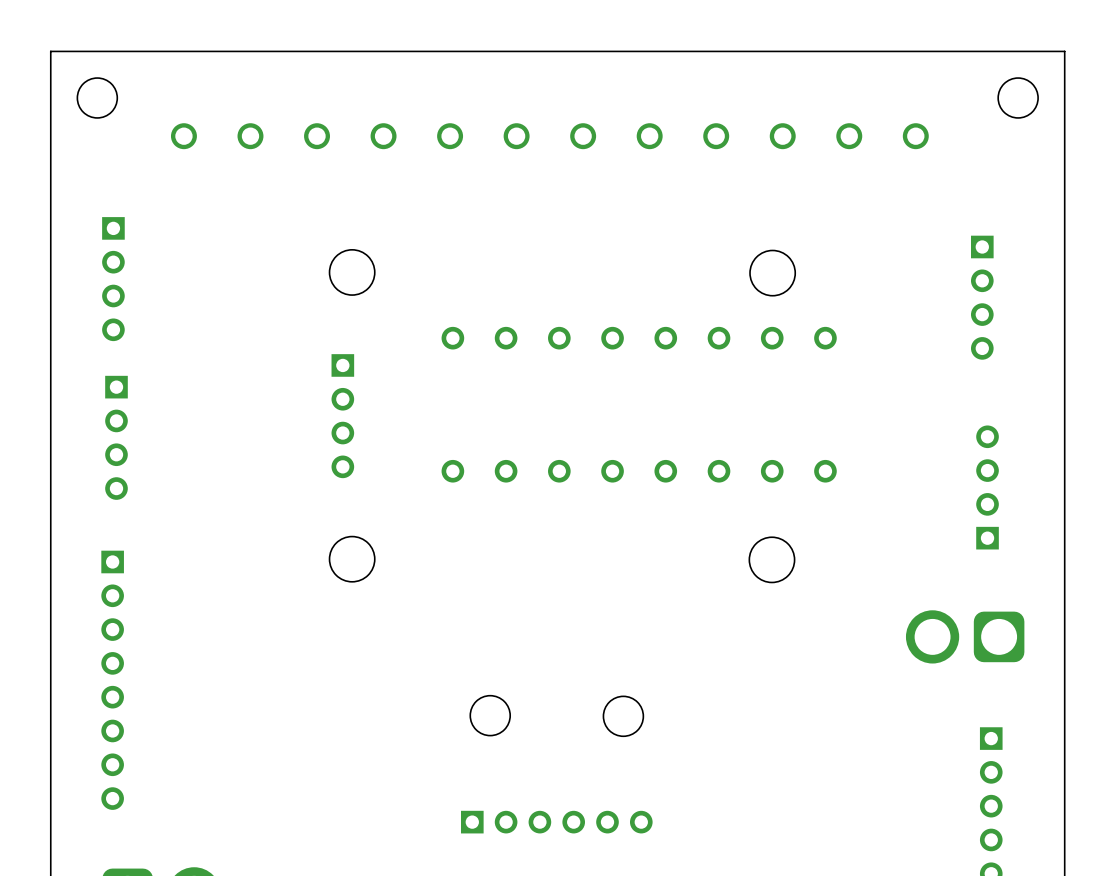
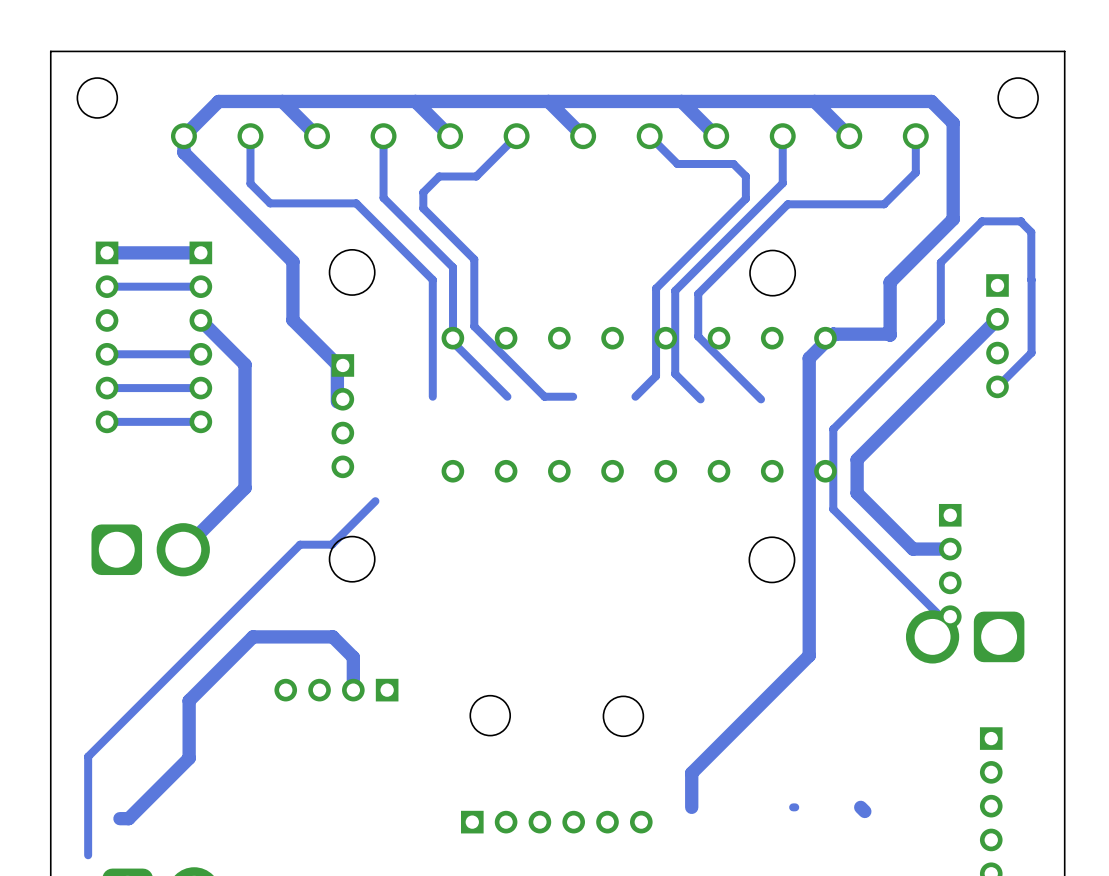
track: none -> (282, 101) (317, 136)
track: none -> (415, 101) (450, 136)
track: none -> (548, 101) (583, 136)
track: none -> (681, 101) (716, 136)
track: none -> (814, 101) (849, 136)
track: none -> (250, 136) (250, 183) (270, 203) (356, 203) (432, 279) (432, 396)
track: none -> (383, 136) (383, 197) (453, 267) (453, 342) (507, 396)
track: none -> (516, 136) (476, 176) (439, 176) (423, 192) (423, 208) (474, 259) (474, 326) (544, 396) (573, 396)
track: none -> (649, 136) (677, 163) (733, 163) (745, 176) (745, 198) (656, 288) (656, 376) (635, 396)
track: none -> (782, 136) (782, 183) (675, 290) (675, 373) (700, 399)
track: none -> (915, 136) (915, 172) (884, 204) (787, 204) (698, 293) (698, 336) (761, 399)
track: none -> (200, 252) (107, 252)
part: (113, 279) -> none
track: none -> (200, 286) (107, 286)
part position: (982, 297) -> (997, 336)
track: none -> (997, 319) (857, 459) (857, 493) (913, 549) (950, 549)
track: none -> (200, 320) (245, 364) (245, 488) (183, 549)
track: none -> (833, 334) (890, 335) (890, 282) (953, 219) (953, 123) (931, 101) (218, 101) (183, 136) (183, 152) (292, 261) (292, 320) (337, 364) (337, 401)
track: none -> (833, 334) (809, 358) (809, 655) (691, 773) (691, 807)
part: none -> (107, 337)
part: none -> (200, 337)
track: none -> (200, 354) (107, 354)
track: none -> (997, 386) (1031, 352) (1031, 232) (1021, 221) (982, 221) (940, 262) (940, 321) (833, 429) (833, 509) (940, 616)
track: none -> (200, 388) (107, 388)
track: none -> (200, 421) (107, 421)
part: (116, 437) -> none
part: (987, 487) -> none
track: none -> (375, 501) (331, 544) (300, 544) (88, 756) (88, 855)
part: none -> (150, 549)
part: none -> (950, 565)
part: (112, 680) -> none
part: none -> (336, 690)
track: none -> (353, 690) (353, 657) (332, 636) (253, 636) (189, 700) (189, 758) (128, 818) (119, 818)
track: none -> (795, 807) (793, 807)
track: none -> (860, 807) (864, 811)

